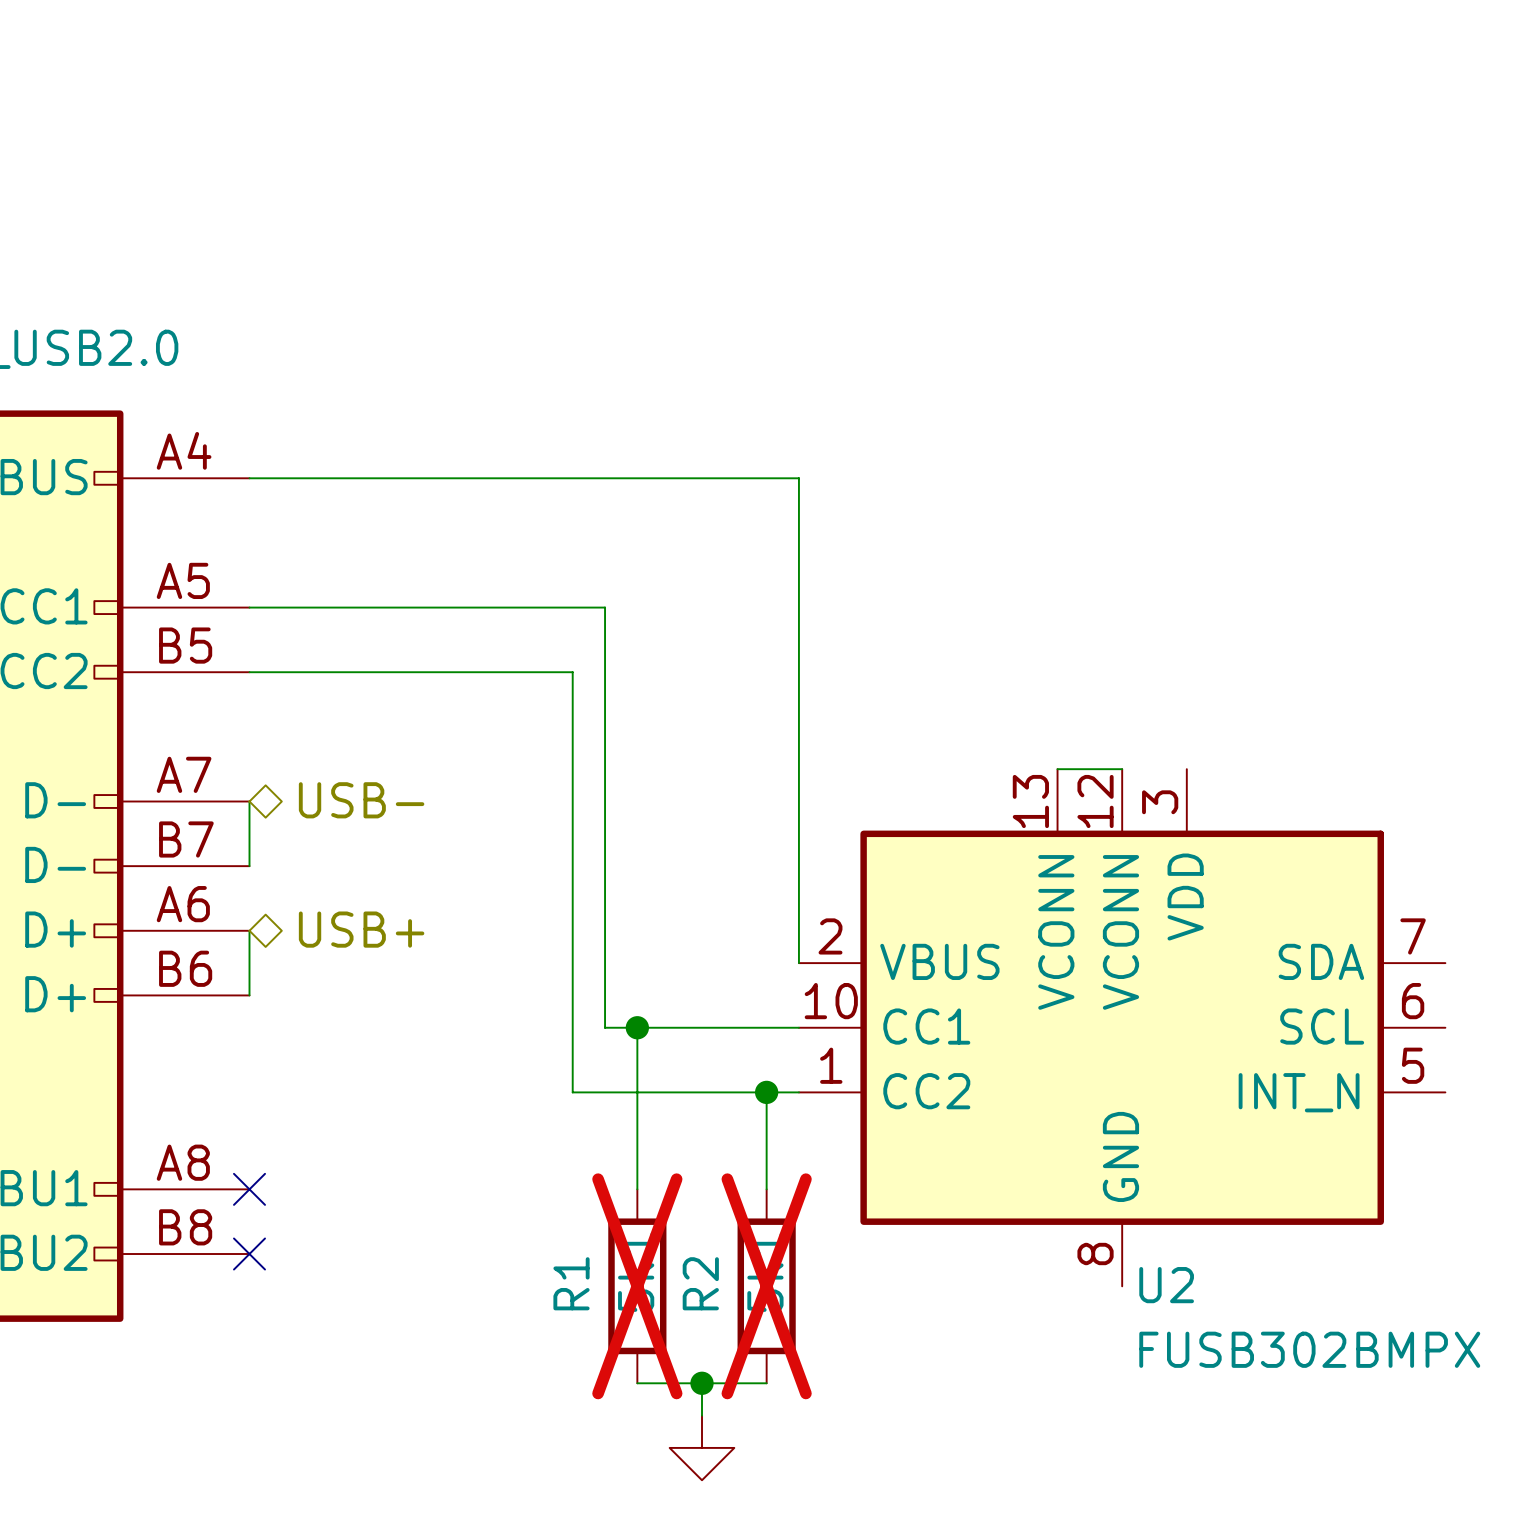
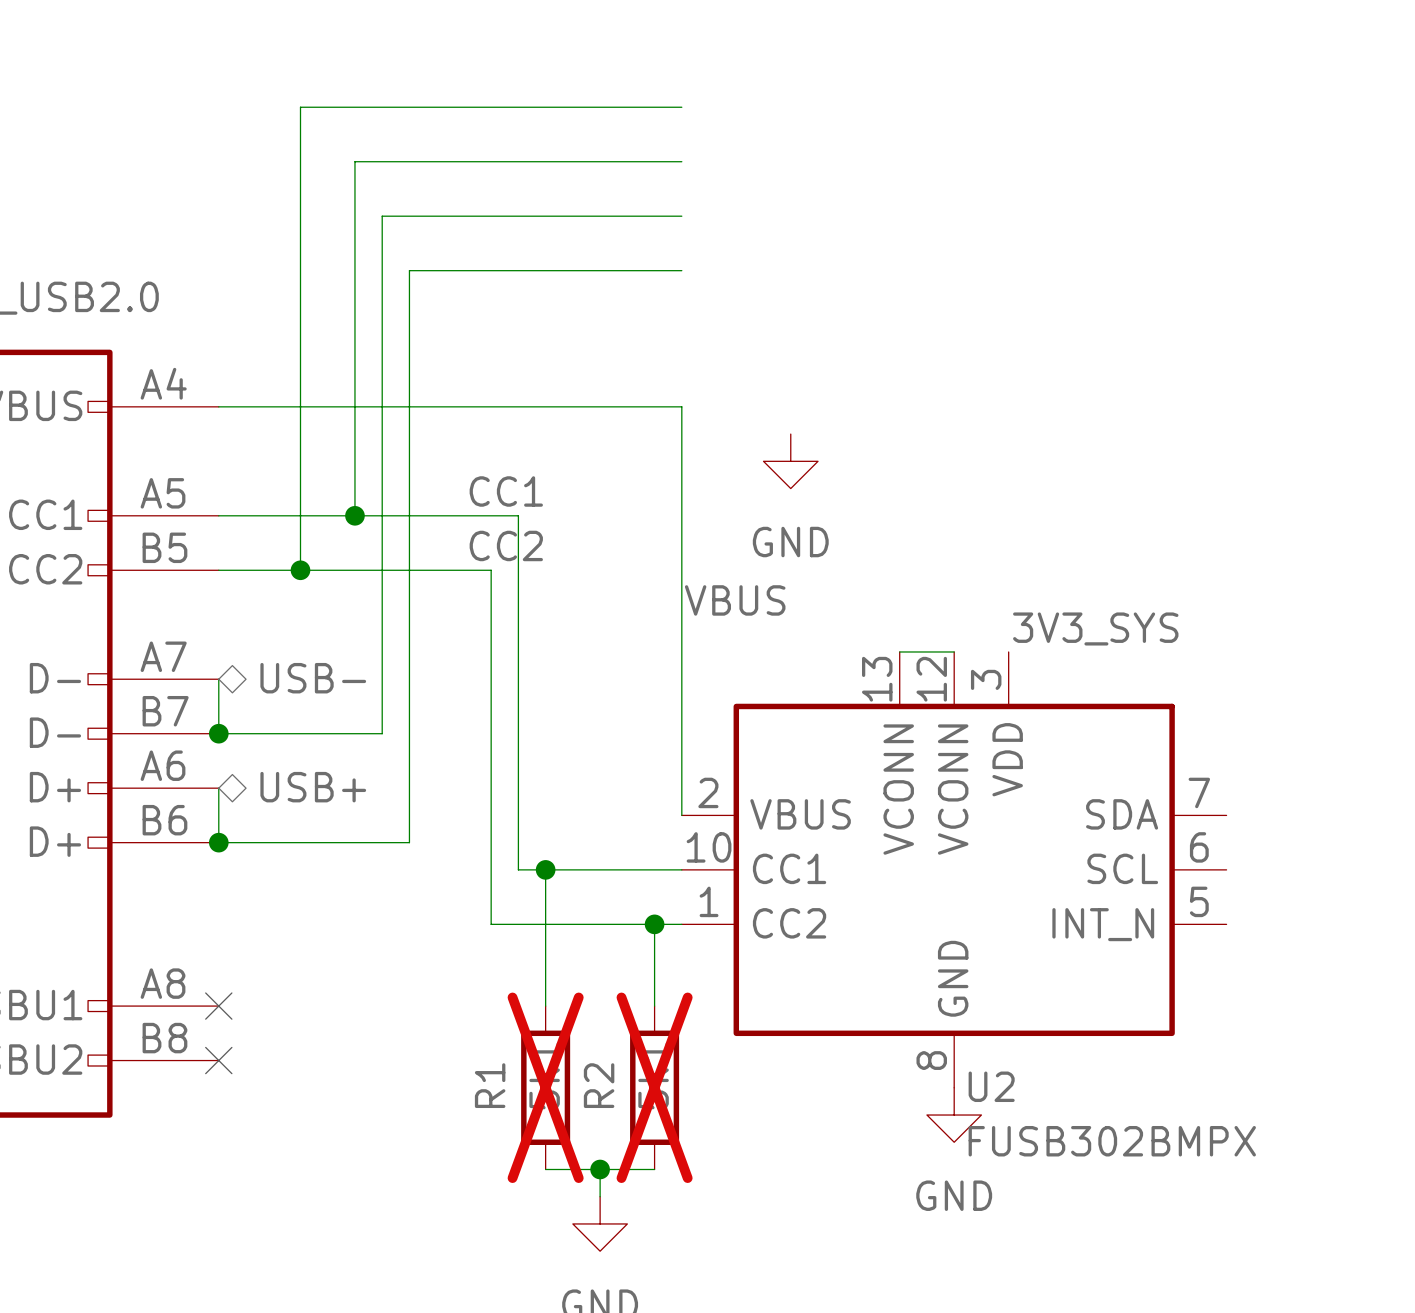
wire: none -> (681, 107) (300, 107) (300, 570)
wire: none -> (681, 161) (354, 161) (354, 515)
wire: none -> (681, 216) (382, 216) (382, 733) (218, 733)
wire: none -> (681, 270) (409, 270) (409, 842) (218, 842)
power symbol: none -> GND (790, 461)
label: none -> CC1 (506, 491)
junction: none -> (354, 515)
label: none -> CC2 (506, 545)
junction: none -> (300, 570)
label: none -> VBUS (735, 600)
label: none -> 3V3_SYS (1095, 628)
junction: none -> (218, 733)
junction: none -> (218, 842)
power symbol: none -> GND (954, 1115)

